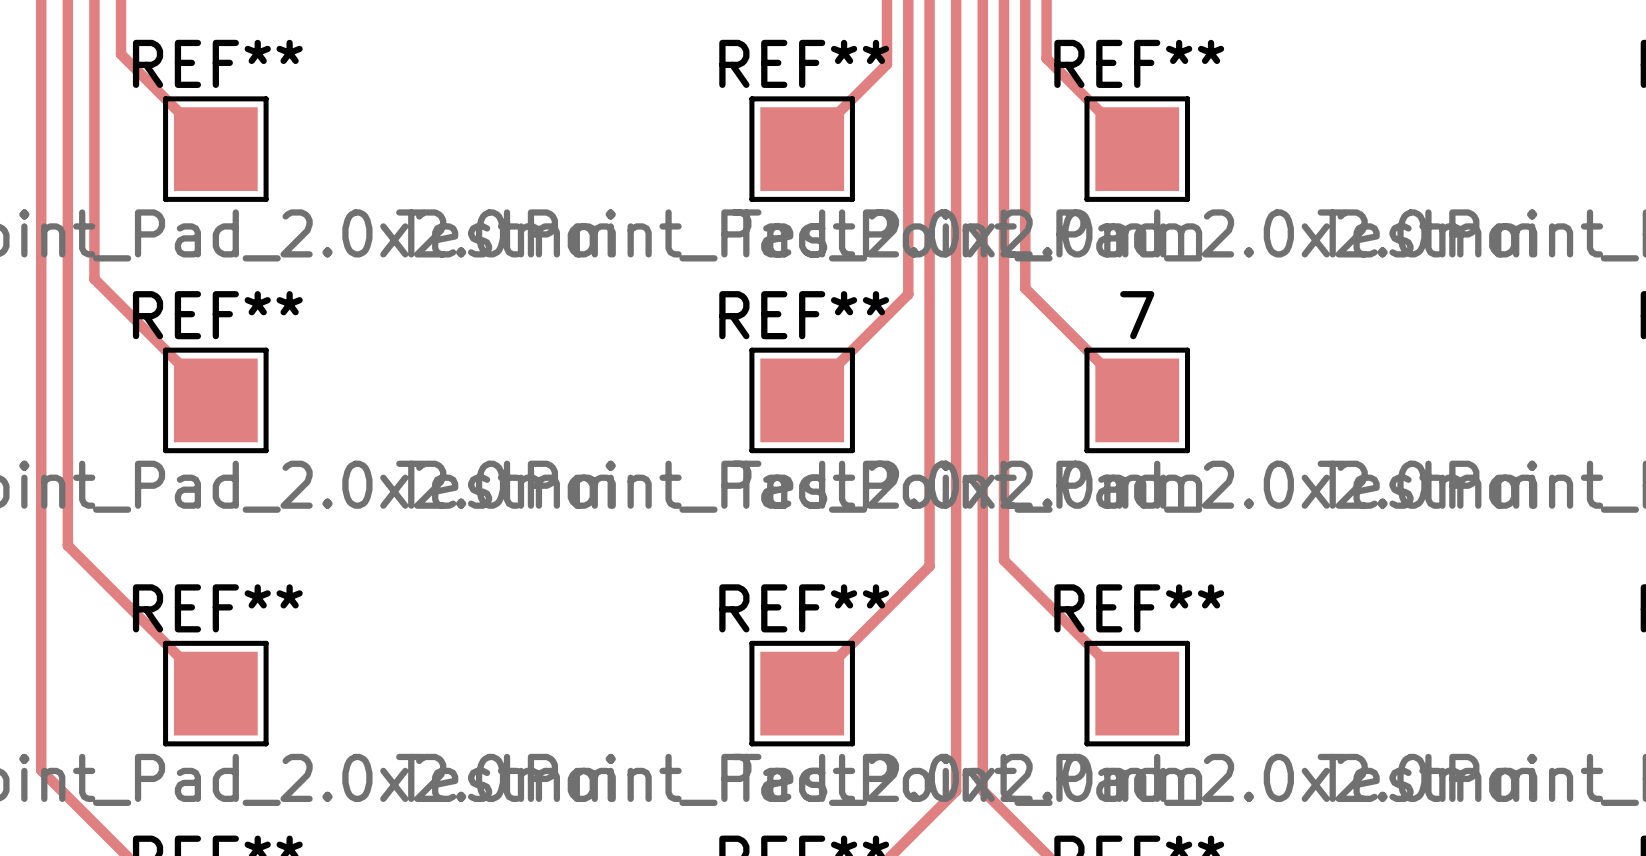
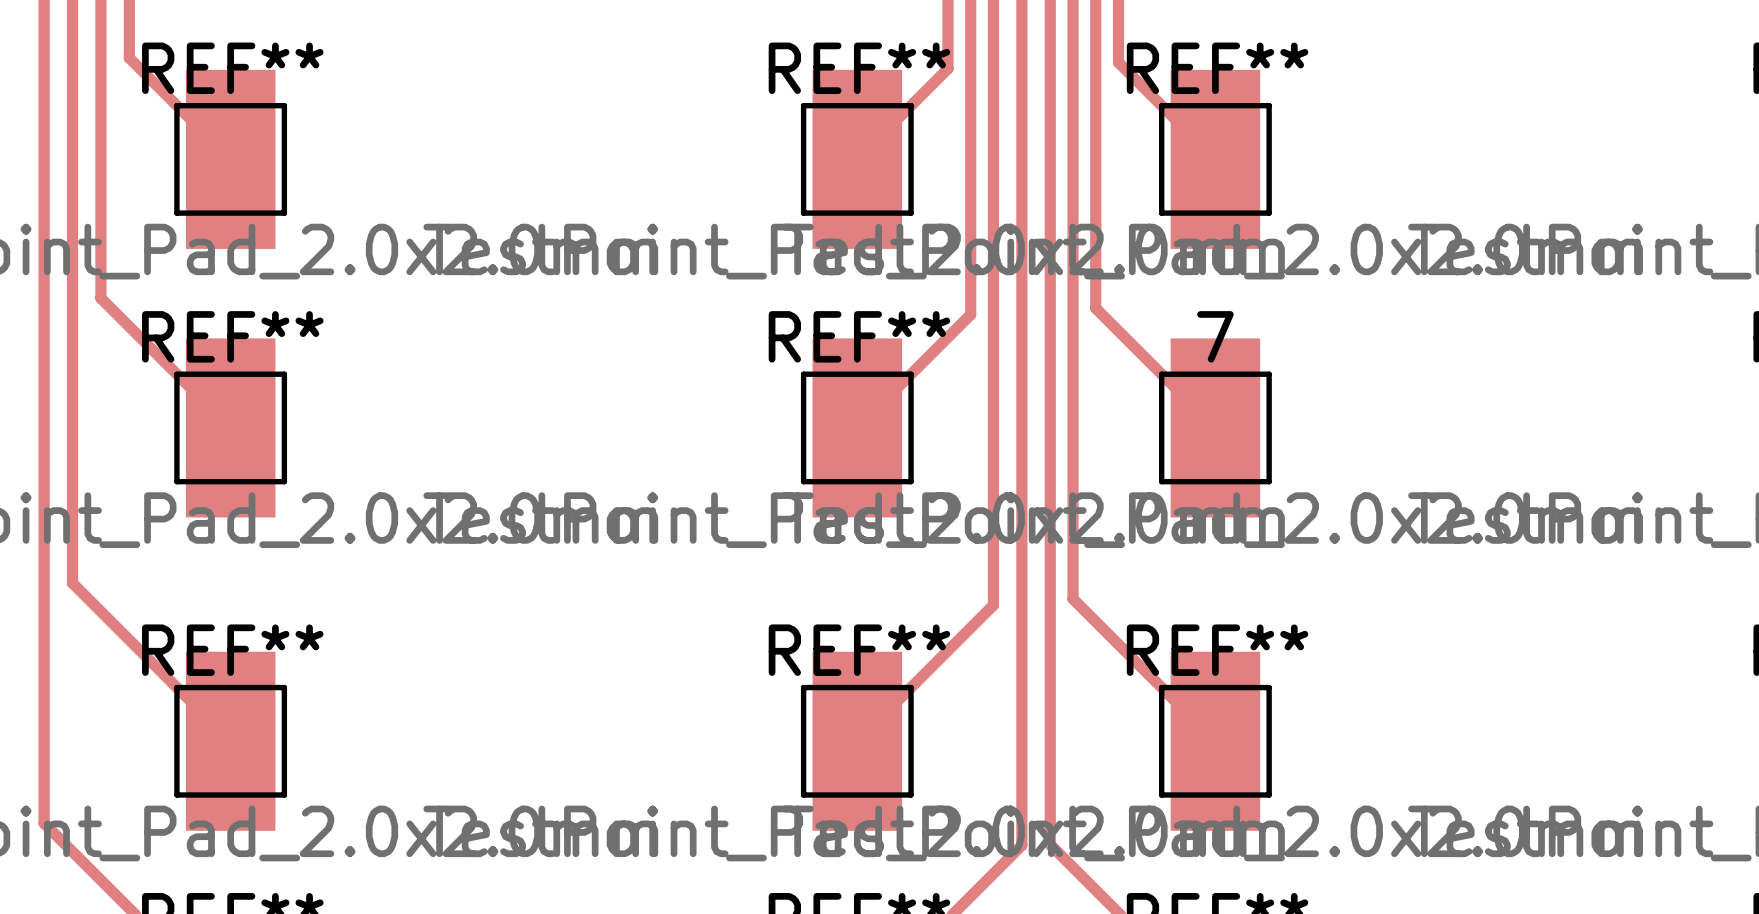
REF** footprint: [163, 96, 269, 202] -> [174, 69, 288, 249]
REF** footprint: [749, 96, 855, 202] -> [800, 69, 914, 249]
REF** footprint: [1084, 96, 1191, 202] -> [1159, 69, 1272, 249]
REF** footprint: [163, 347, 269, 454] -> [174, 338, 288, 518]
REF** footprint: [749, 347, 855, 454] -> [800, 338, 914, 518]
7 footprint: [1084, 347, 1191, 454] -> [1159, 338, 1272, 518]
REF** footprint: [163, 640, 269, 747] -> [174, 651, 288, 831]
REF** footprint: [749, 640, 855, 747] -> [800, 651, 914, 831]
REF** footprint: [1084, 640, 1191, 747] -> [1159, 651, 1272, 831]

